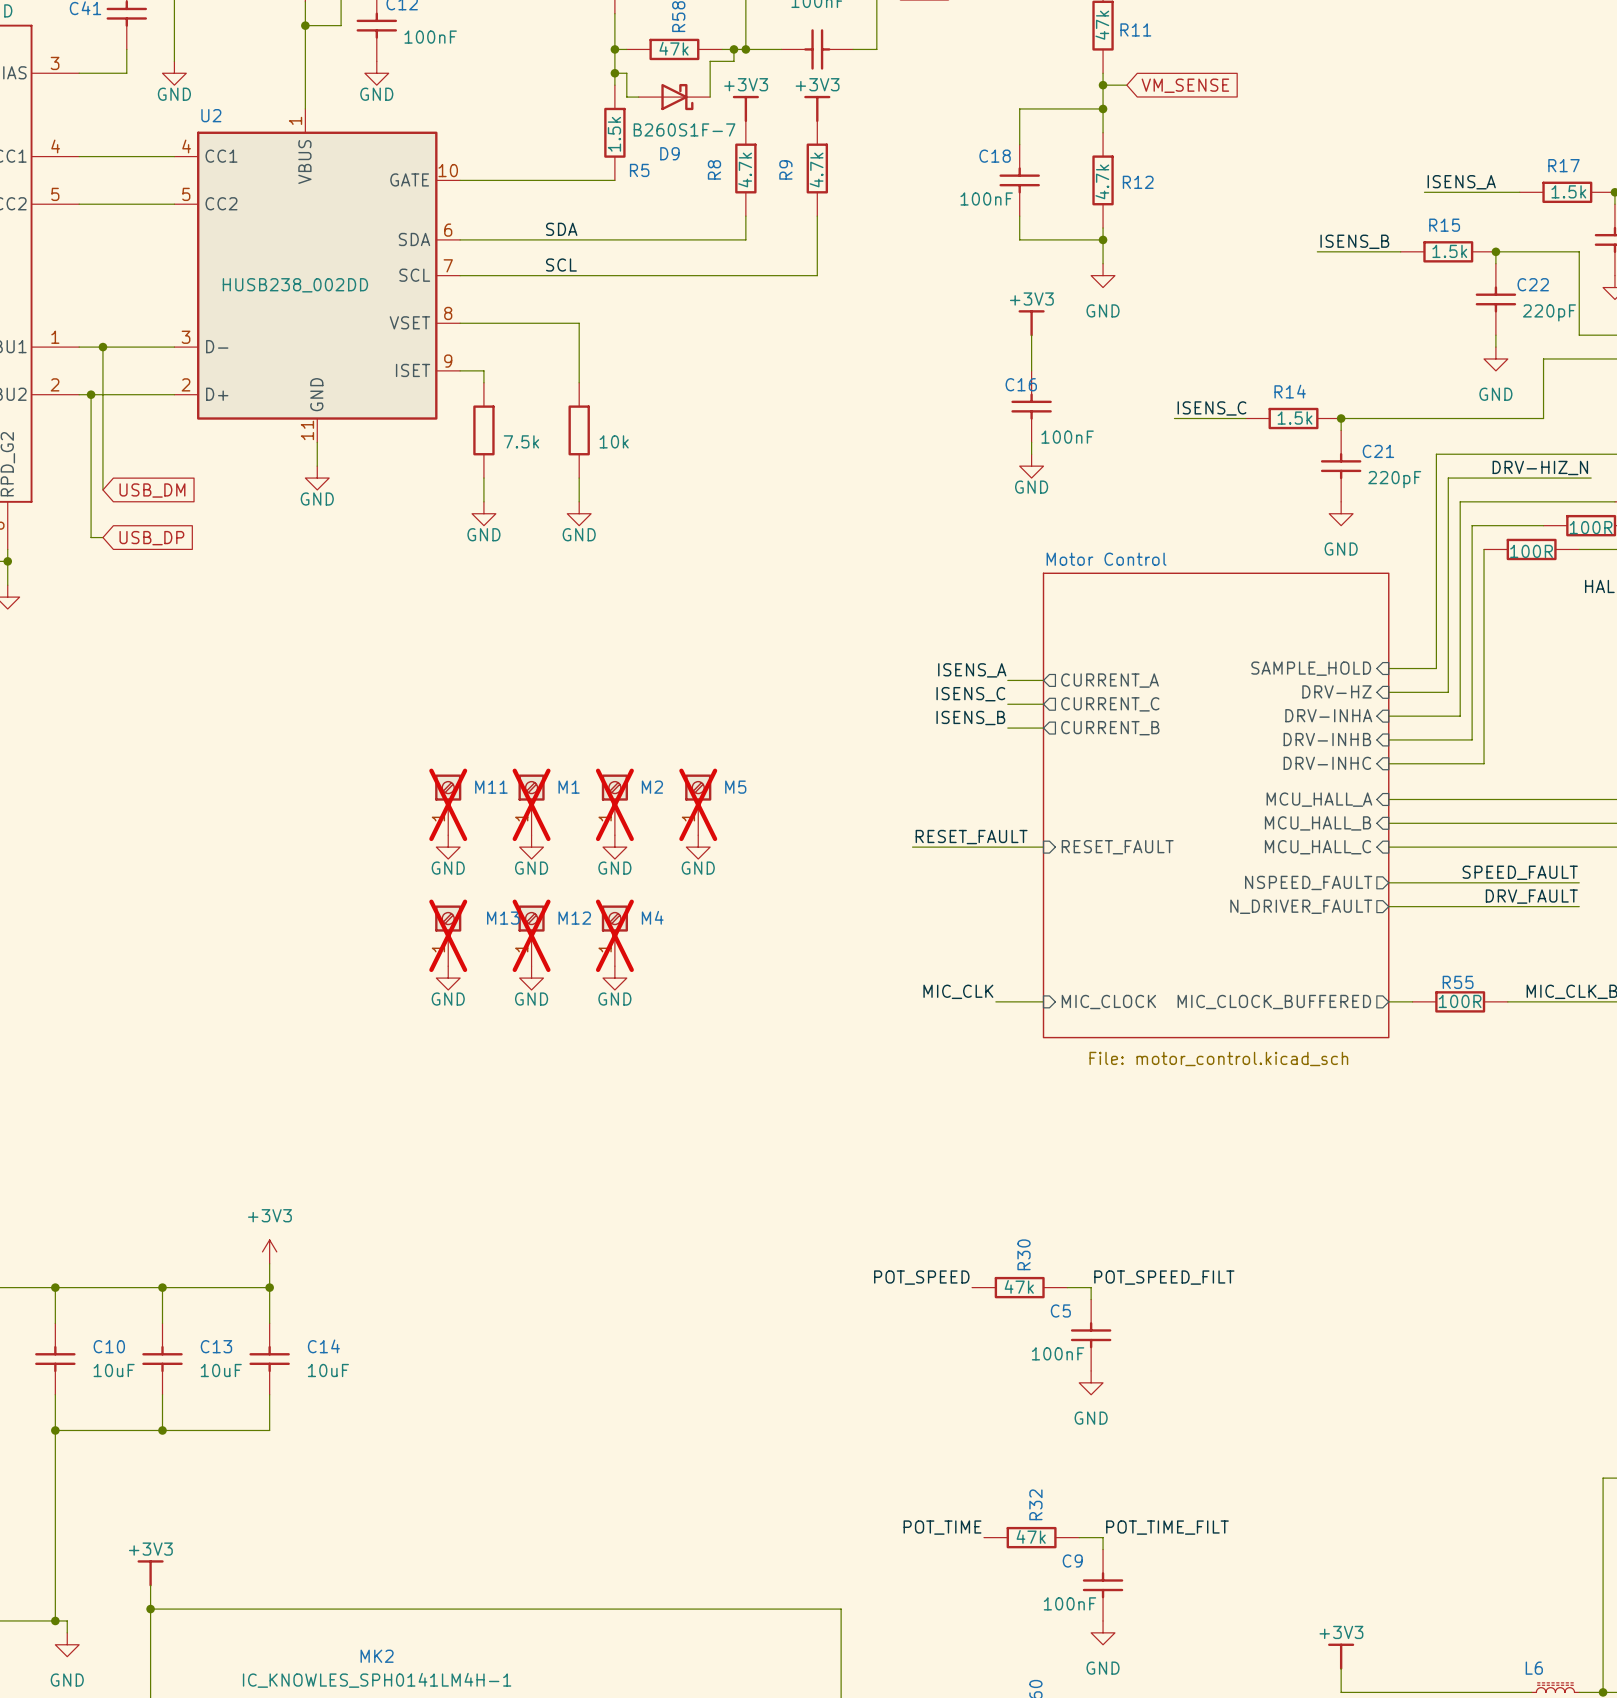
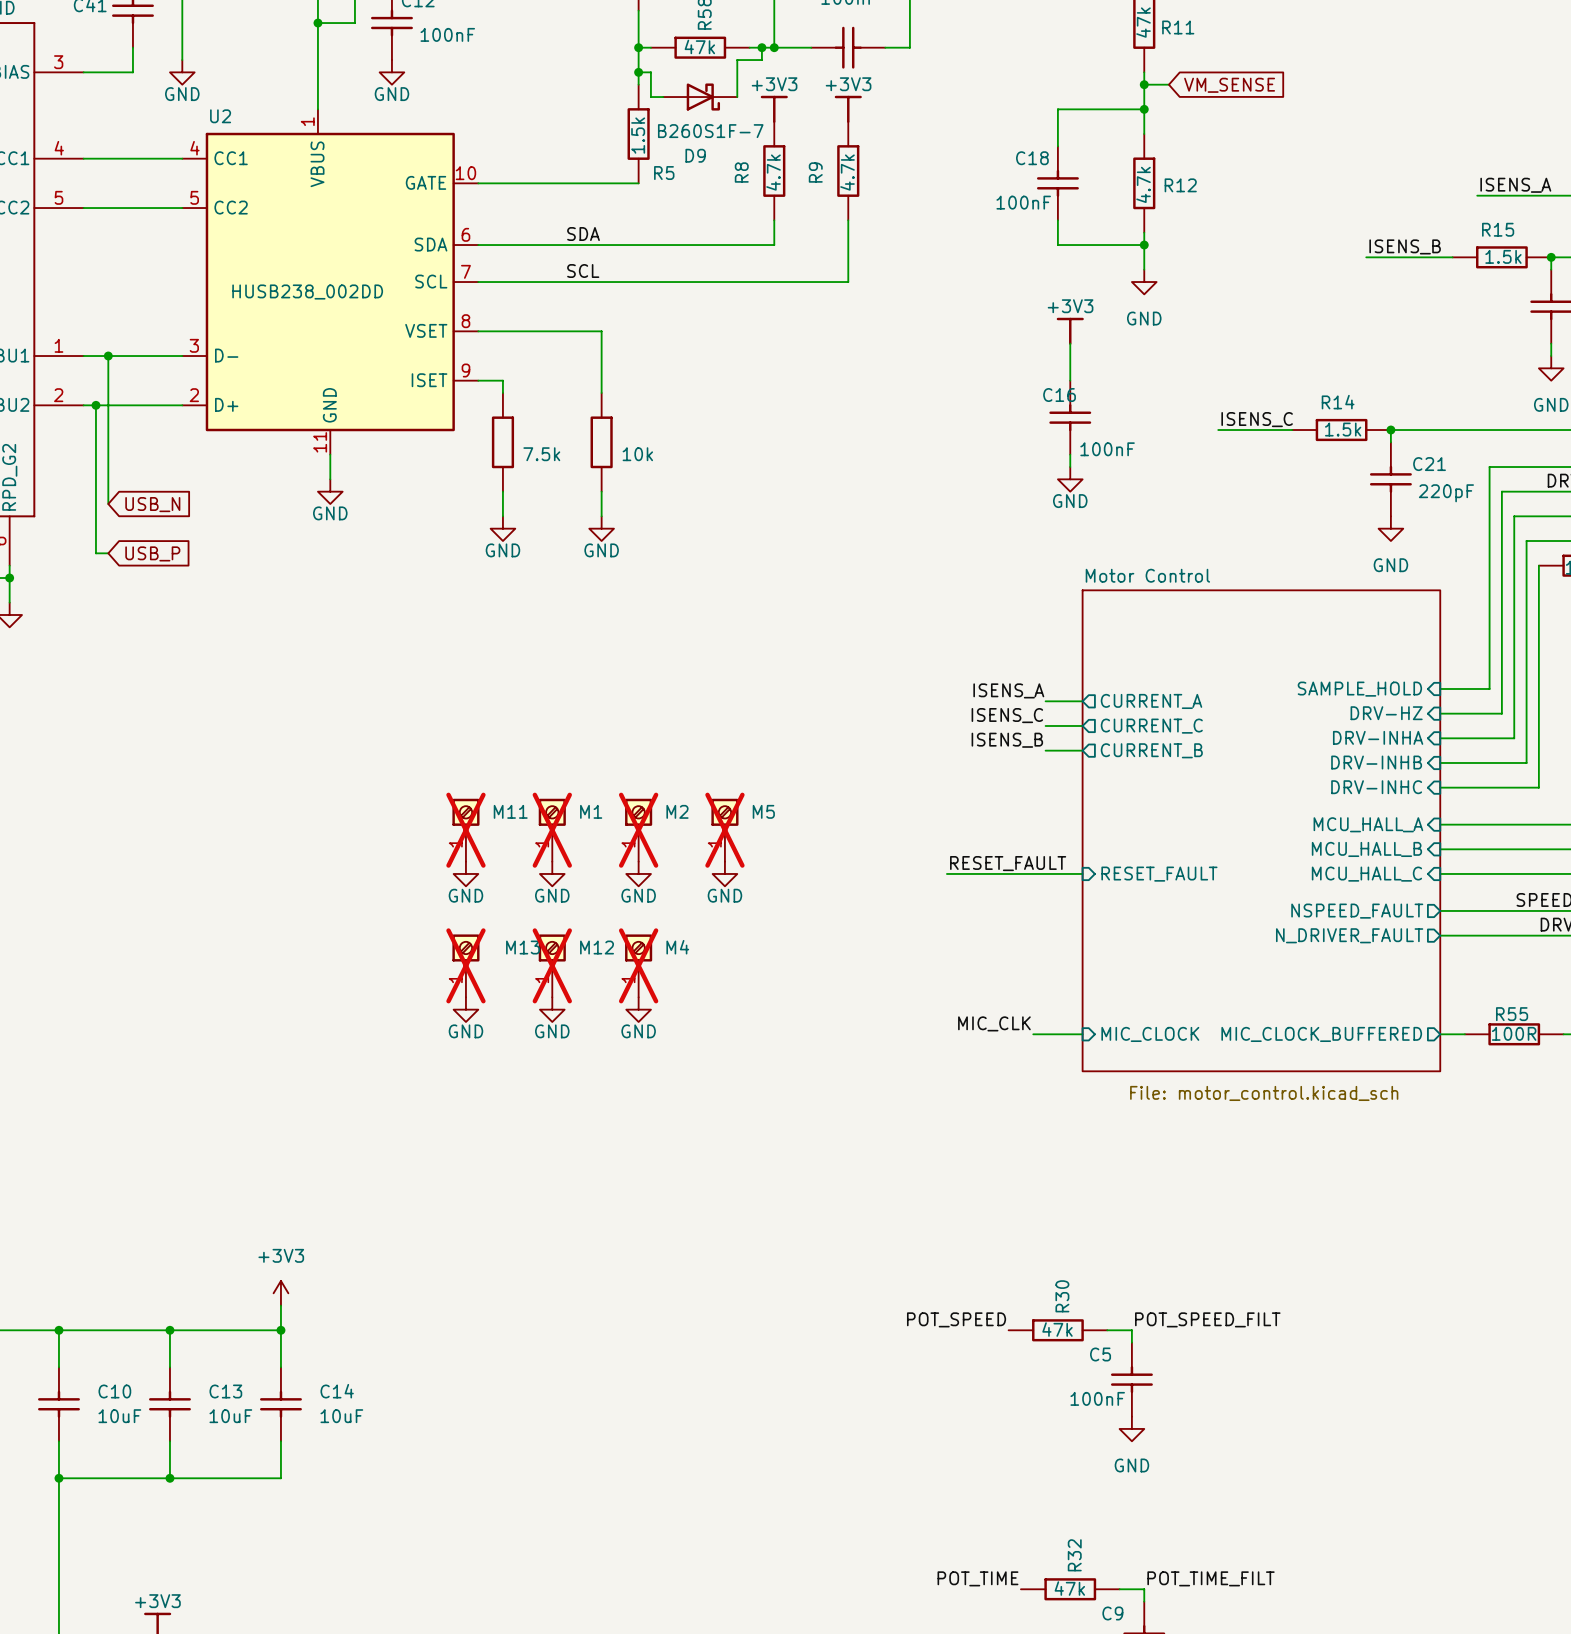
global label: USB_DM (152, 490) -> USB_N (152, 504)
global label: USB_DP (151, 538) -> USB_P (152, 553)

